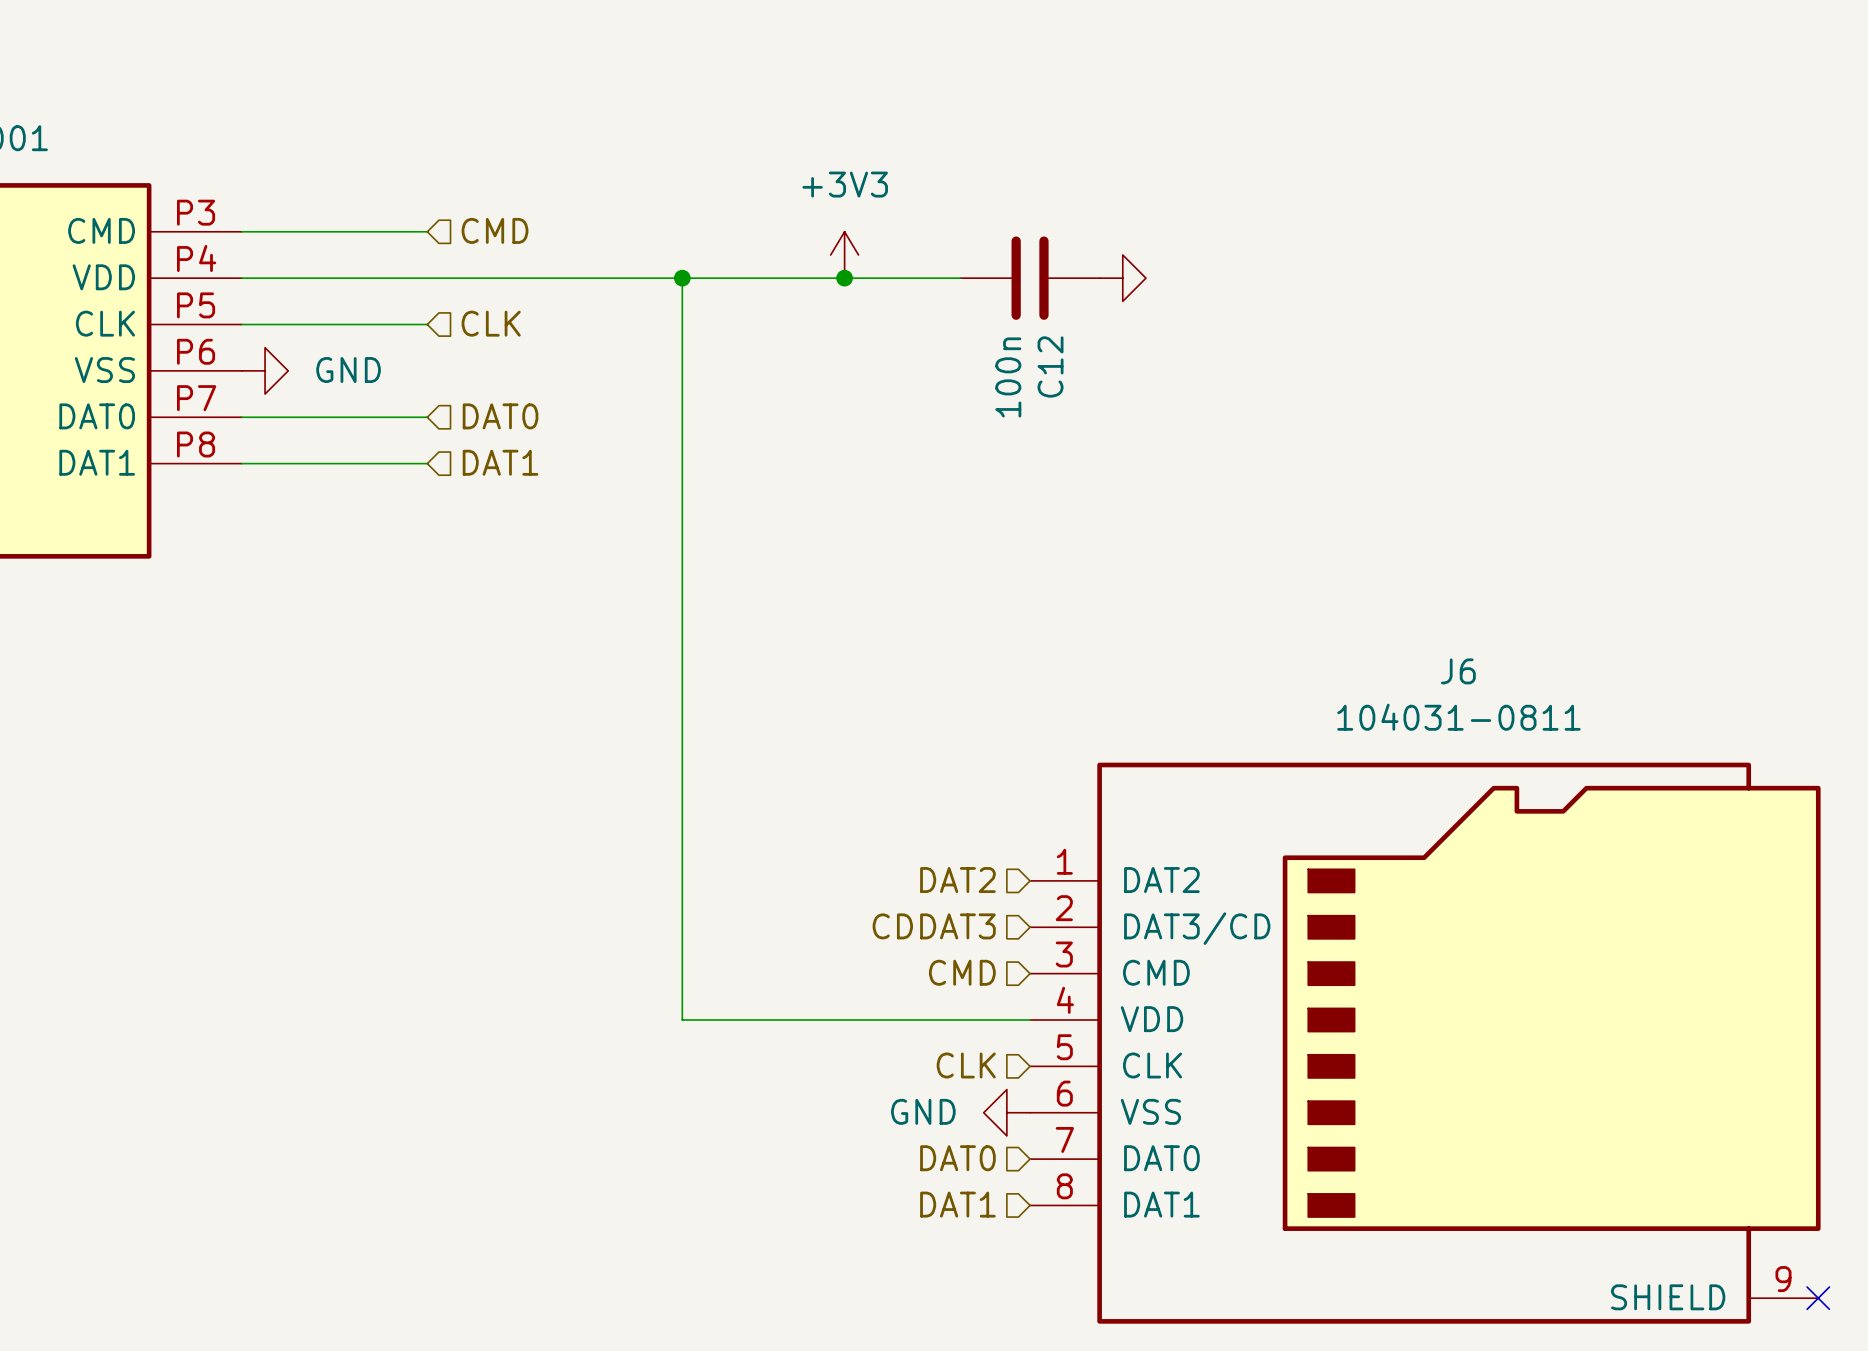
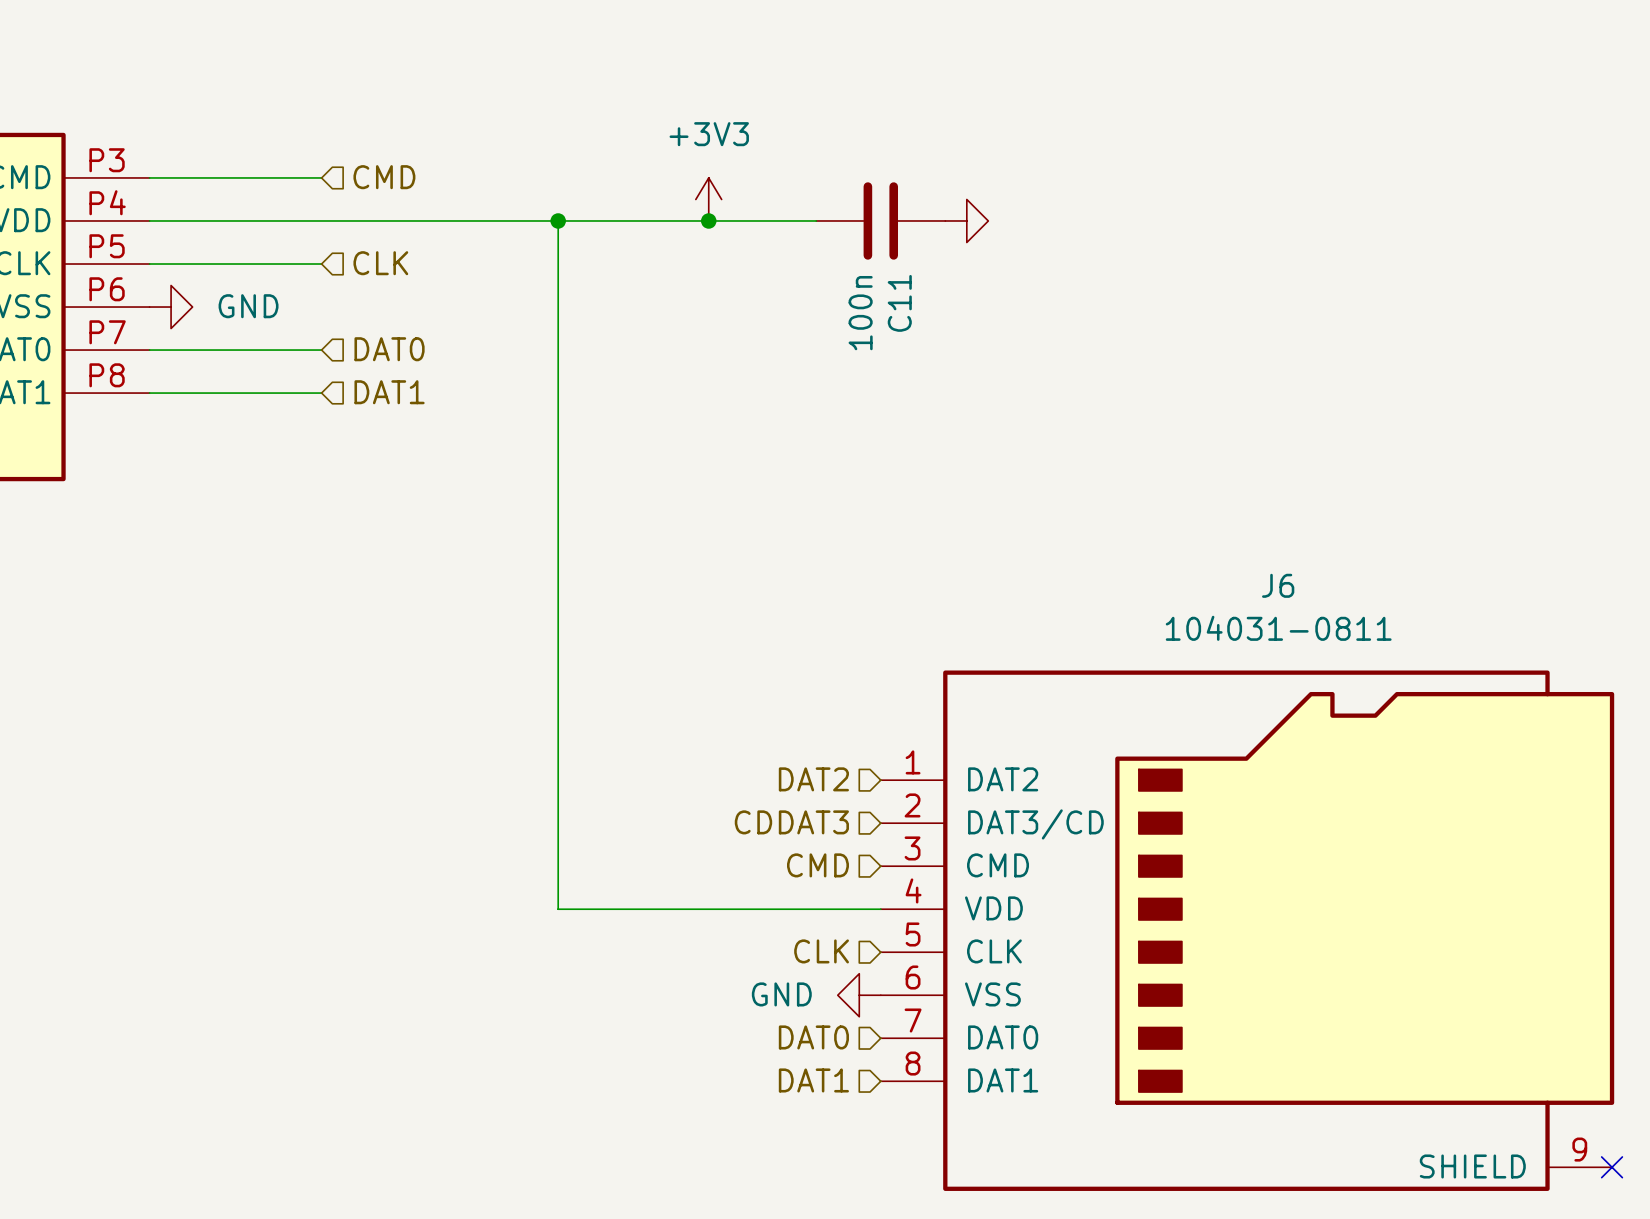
C12 name: C12 (1050, 366) -> C11 (899, 303)

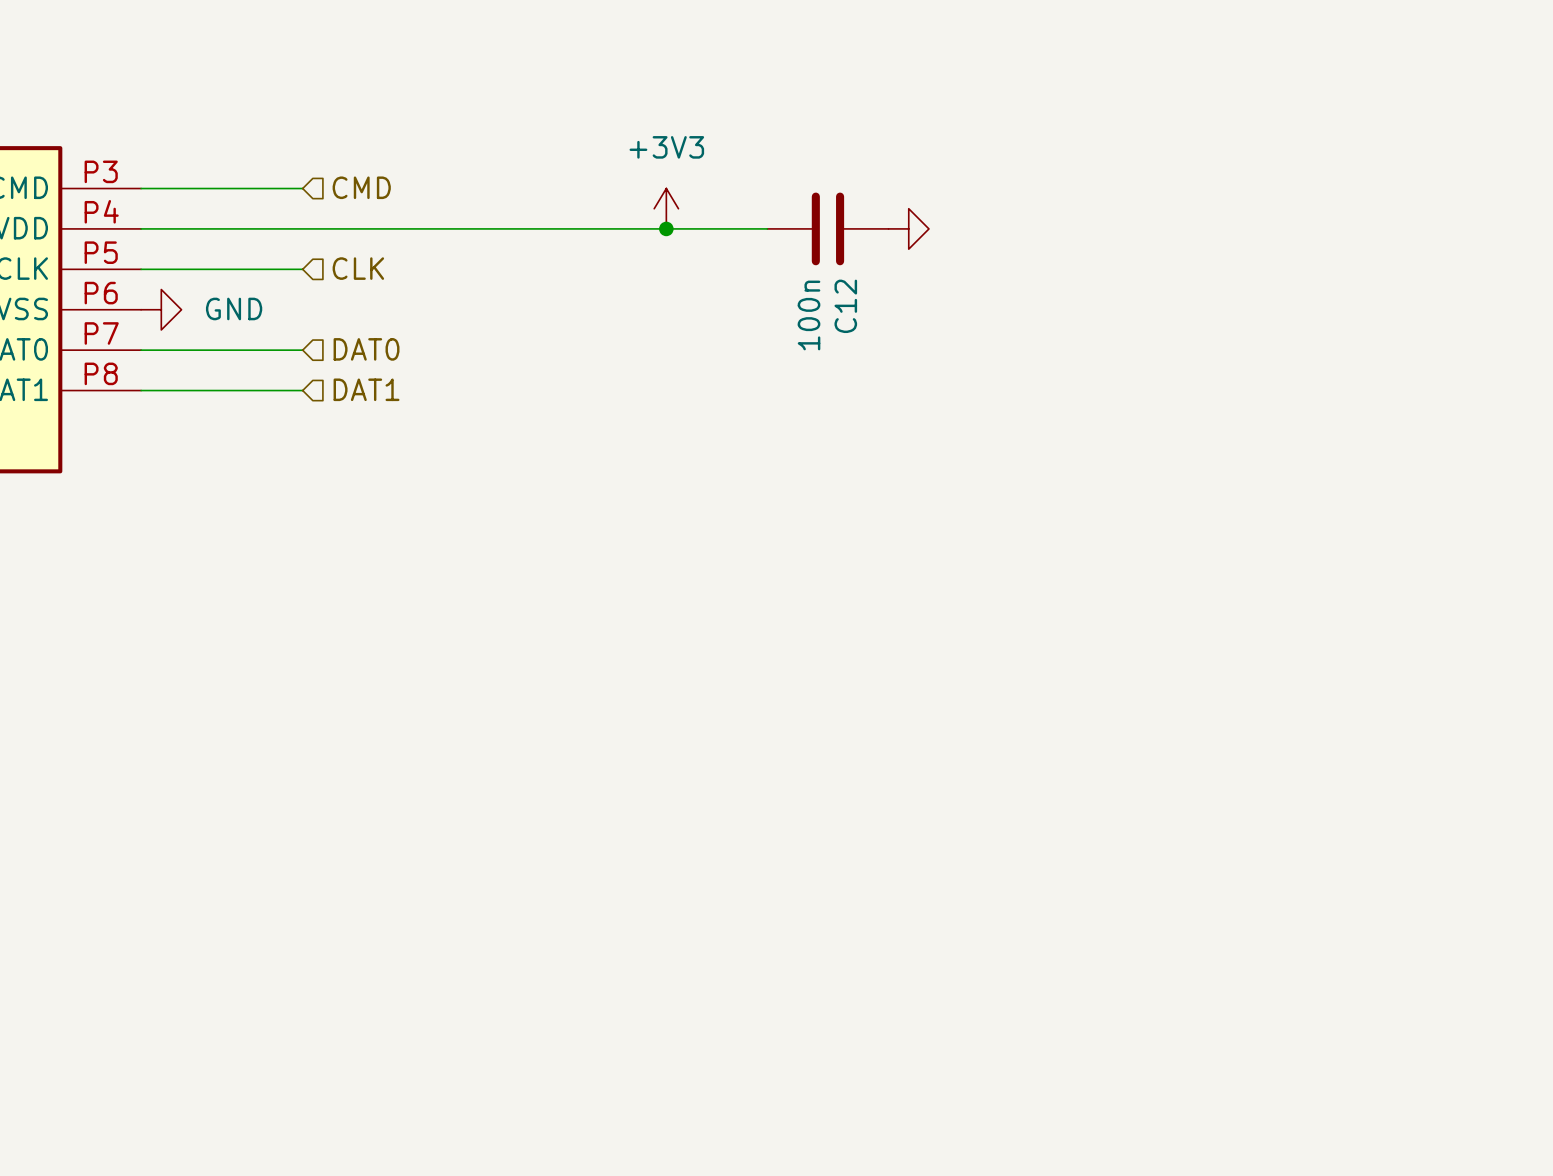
wire: (558, 220) (558, 909) (880, 909) -> none
junction: (558, 220) -> none
C11 name: C11 (899, 303) -> C12 (845, 306)
hierarchical label: DAT2 (813, 779) -> none
hierarchical label: CDDAT3 (791, 822) -> none
hierarchical label: CMD (817, 865) -> none
J6: 104031-0811 (1247, 930) -> none
hierarchical label: CLK (821, 951) -> none
power symbol: GND (859, 995) -> none
hierarchical label: DAT0 (813, 1037) -> none
hierarchical label: DAT1 (813, 1080) -> none
no-connect mark: (1612, 1167) -> none

